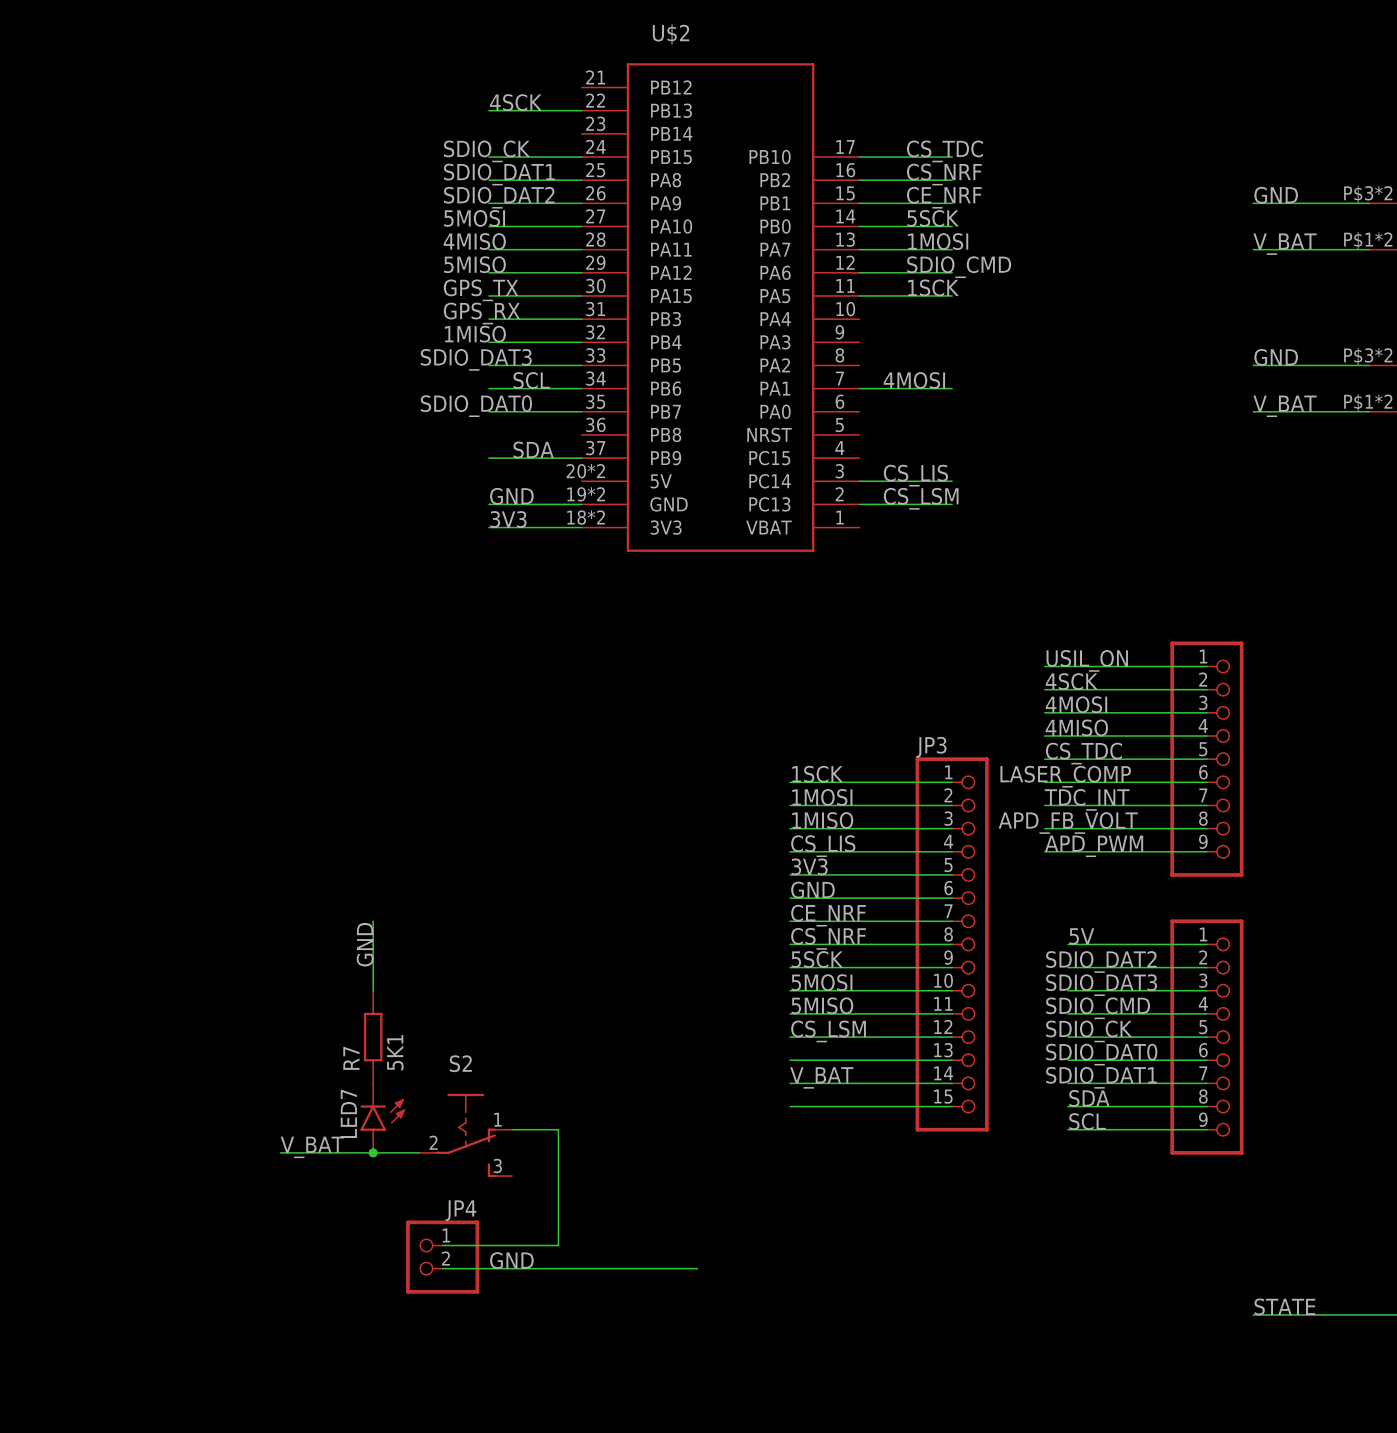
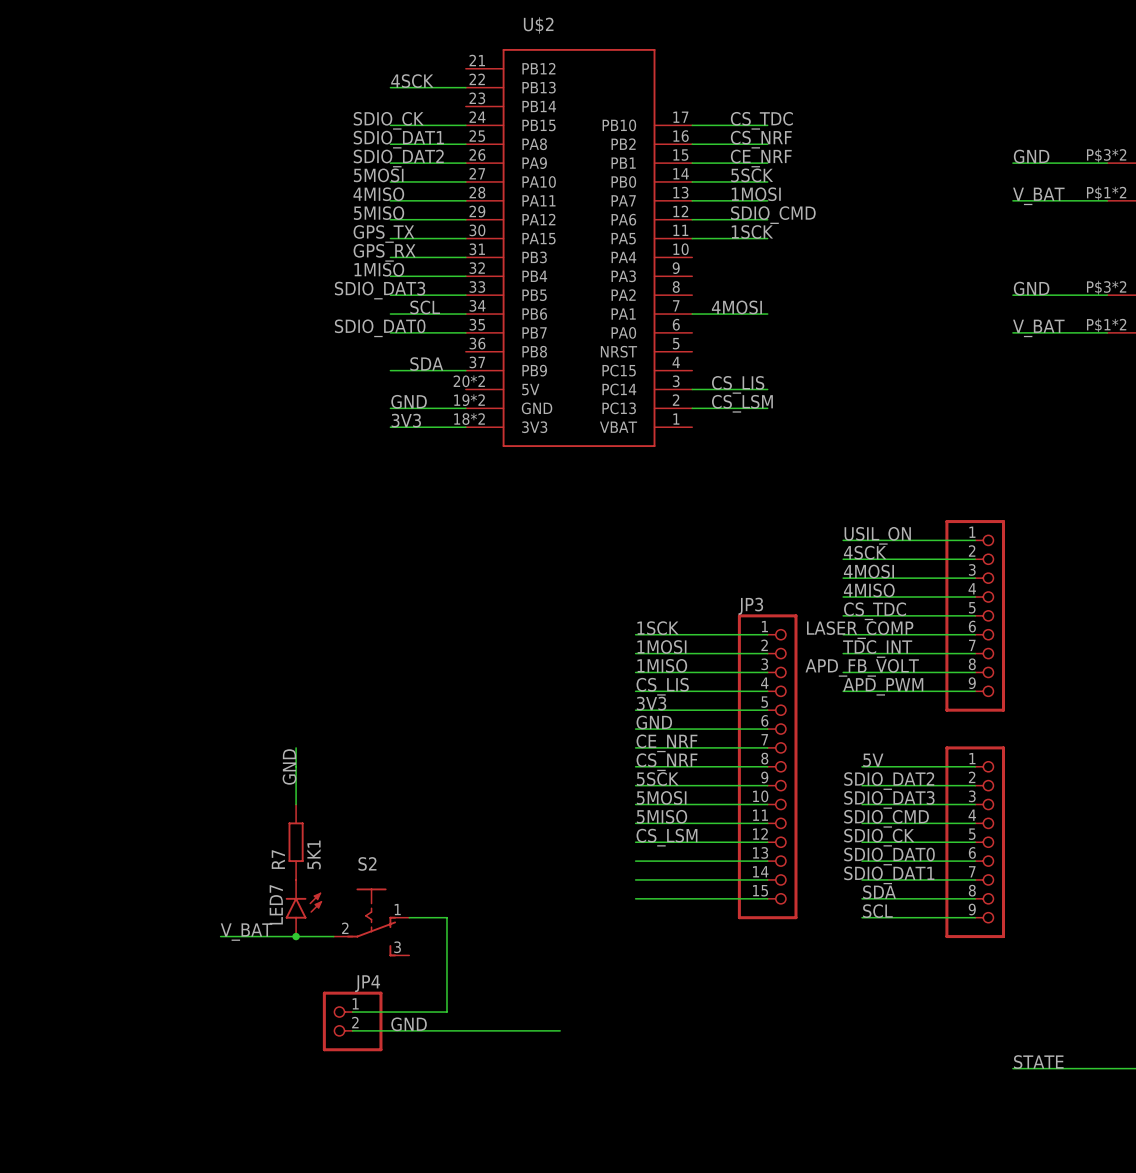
label: V_BAT (821, 1077) -> none

